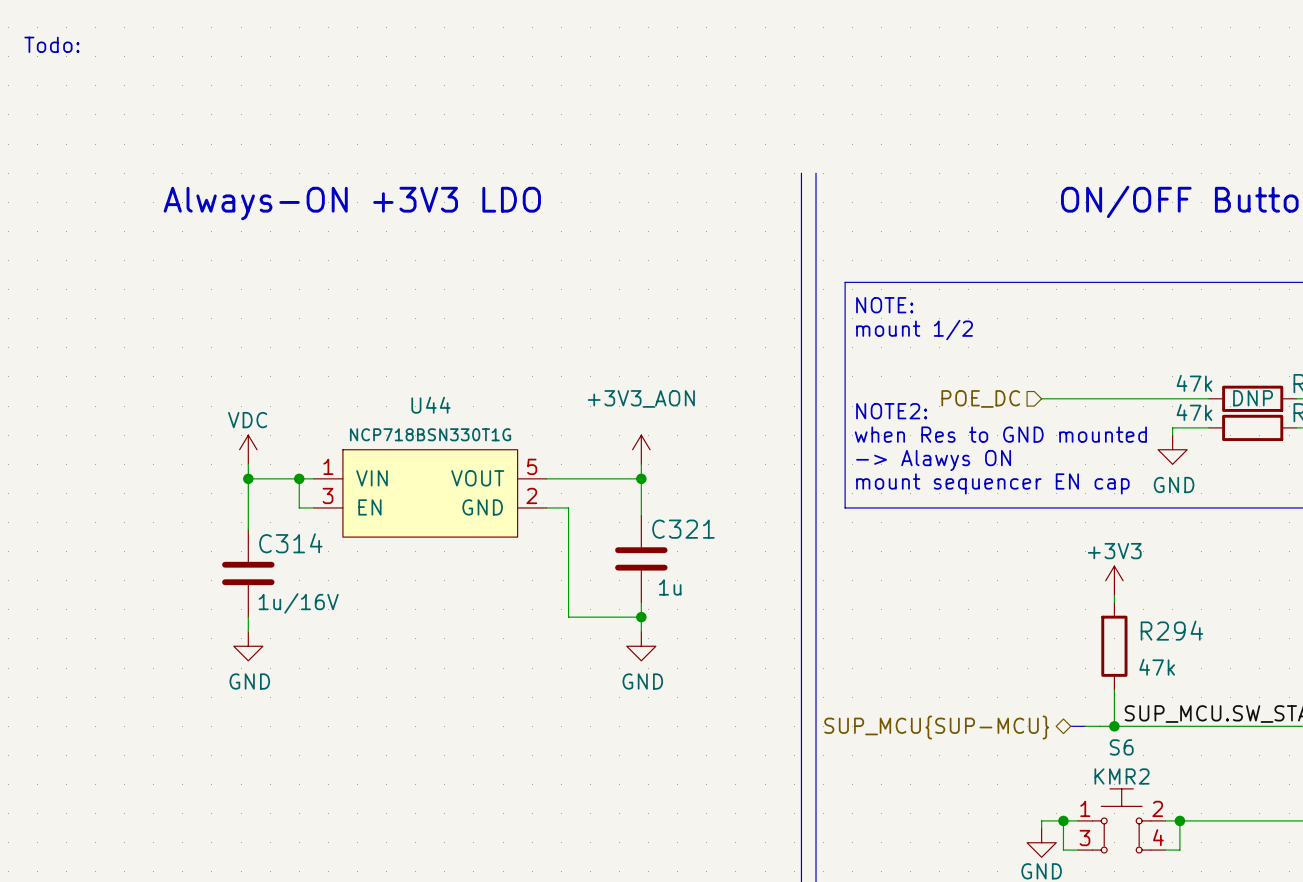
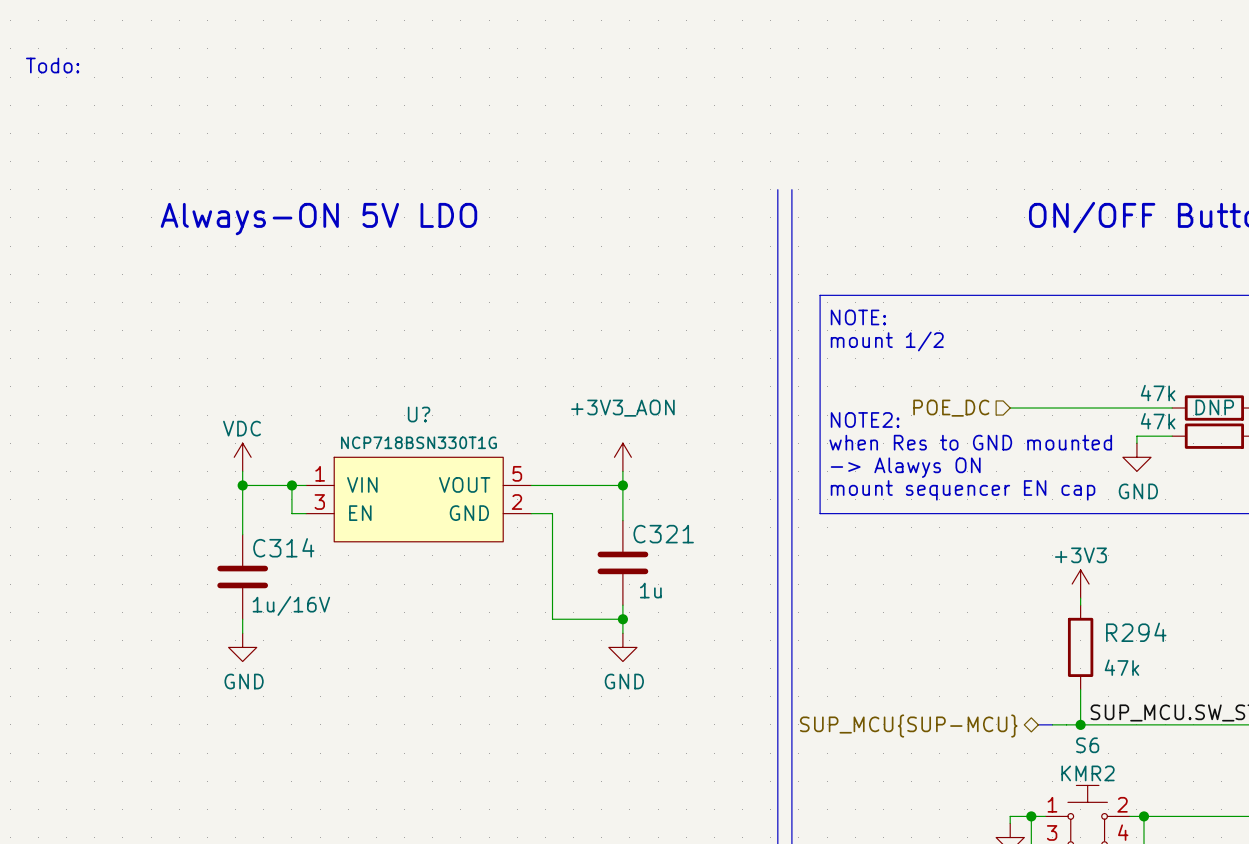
text: Always-ON +3V3 LDO (352, 203) -> Always-ON 5V LDO (318, 219)
U44 name: U44 (430, 405) -> U? (419, 414)

